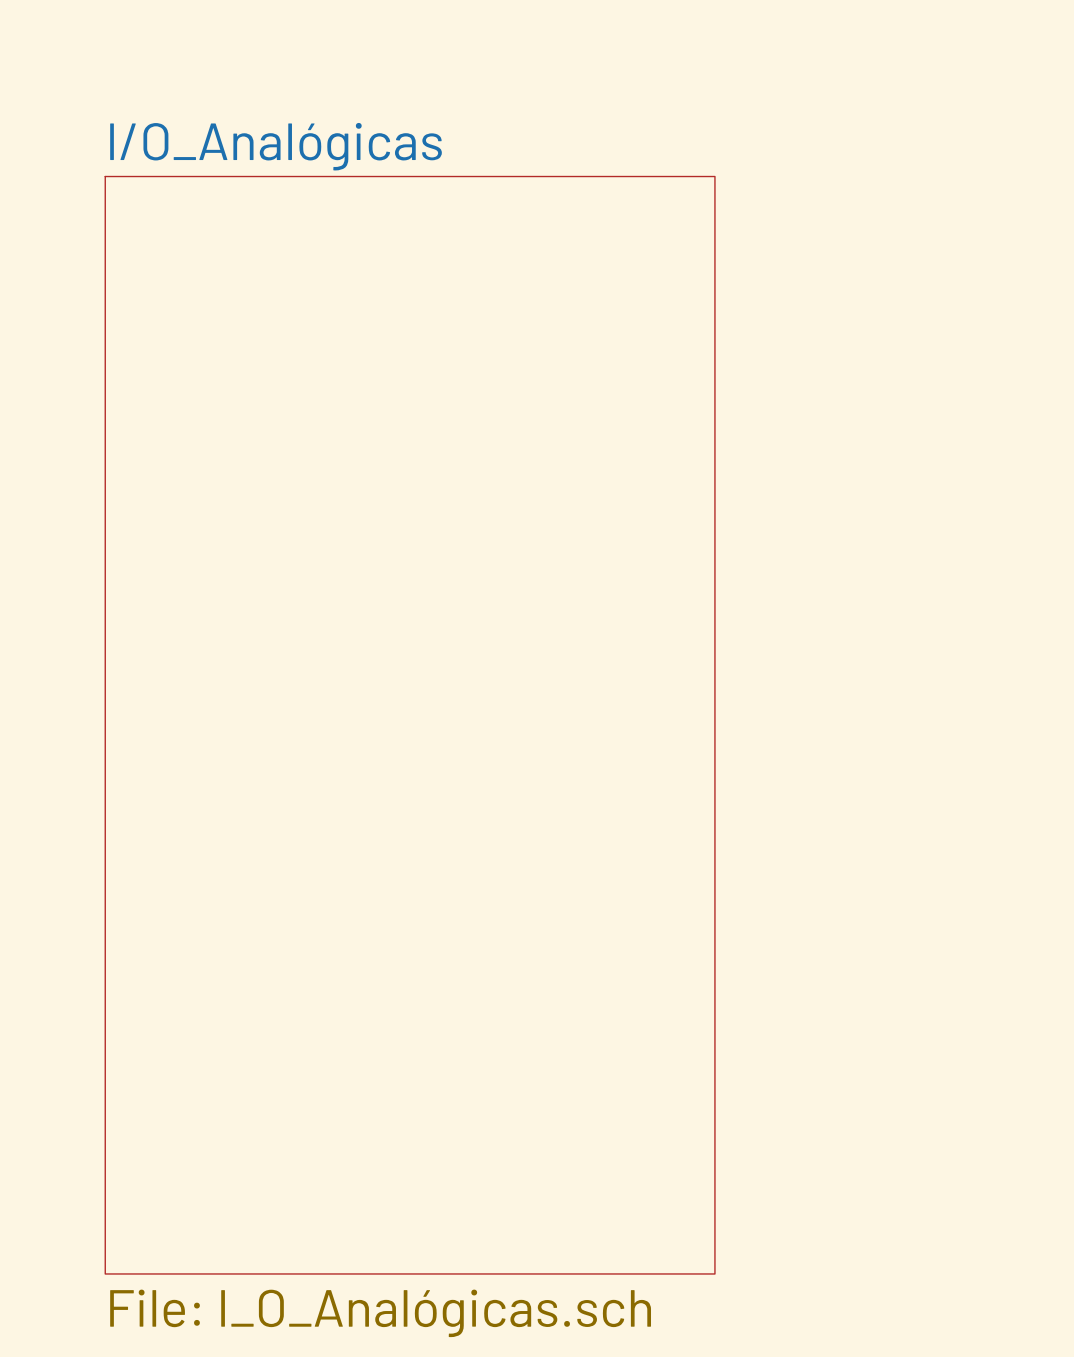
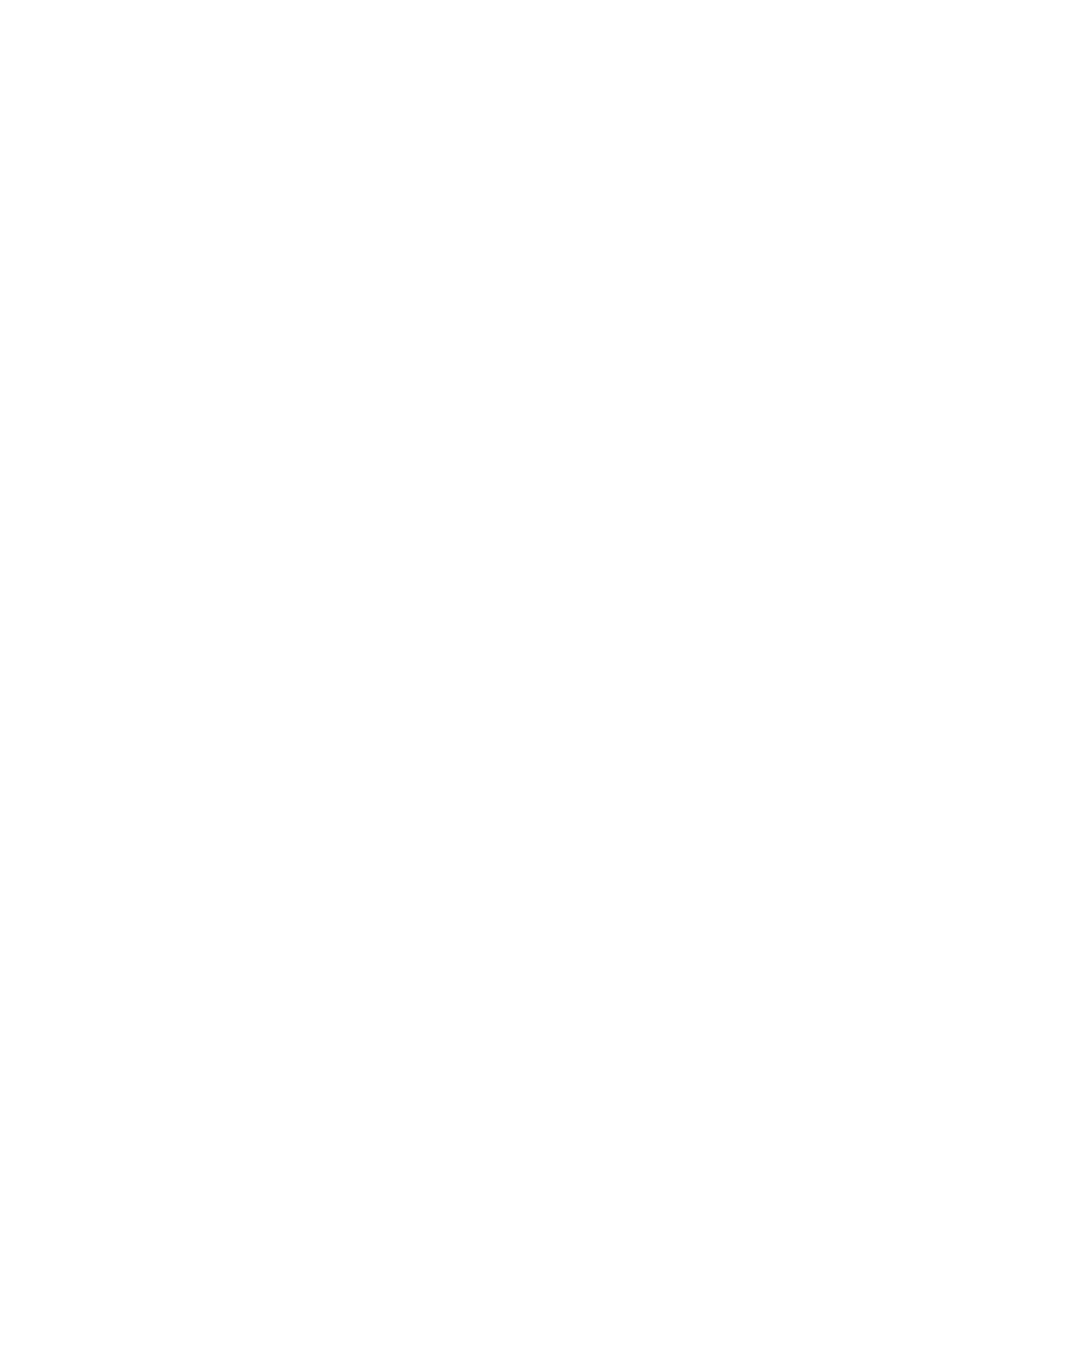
sheet I/O_Analógicas: File: I_O_Analógicas.sch (410, 725) -> none

